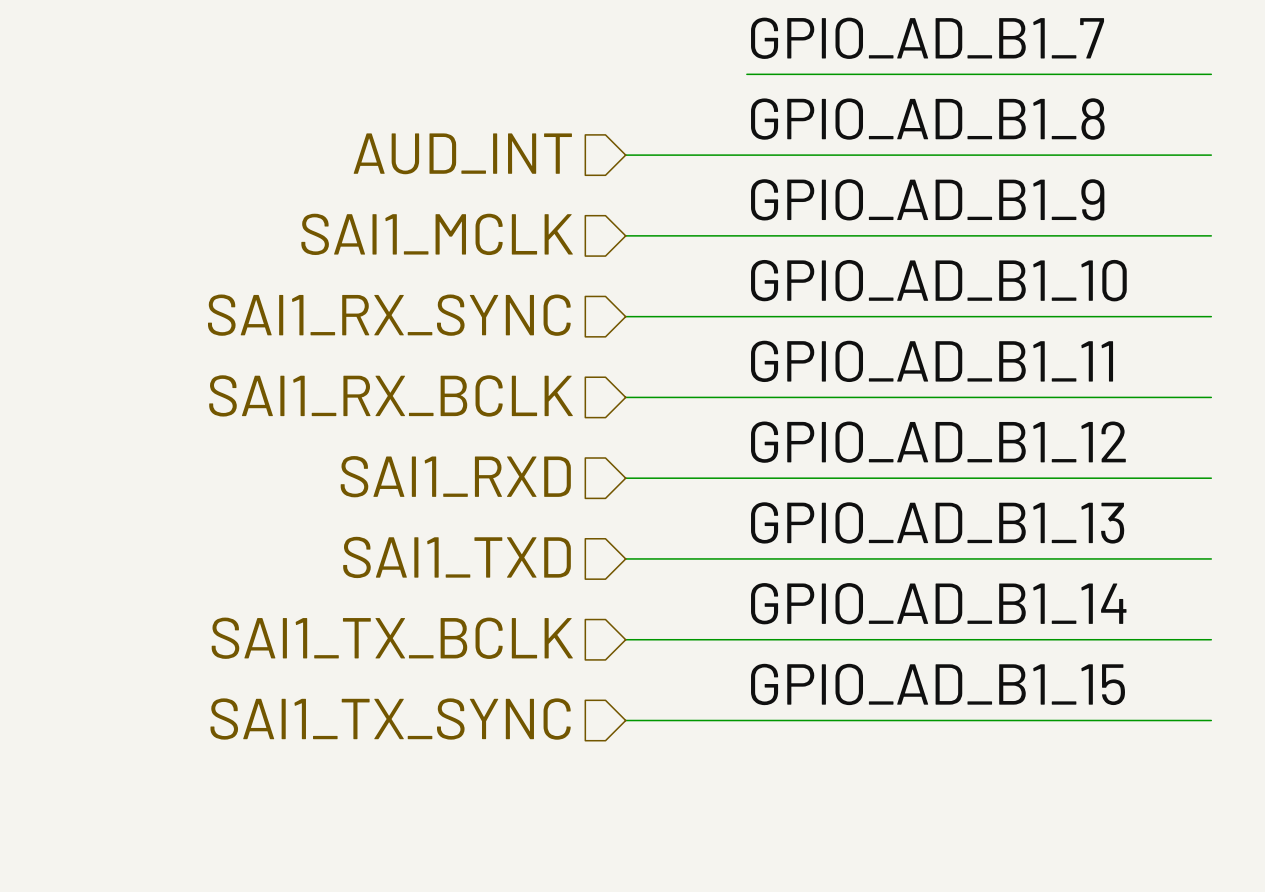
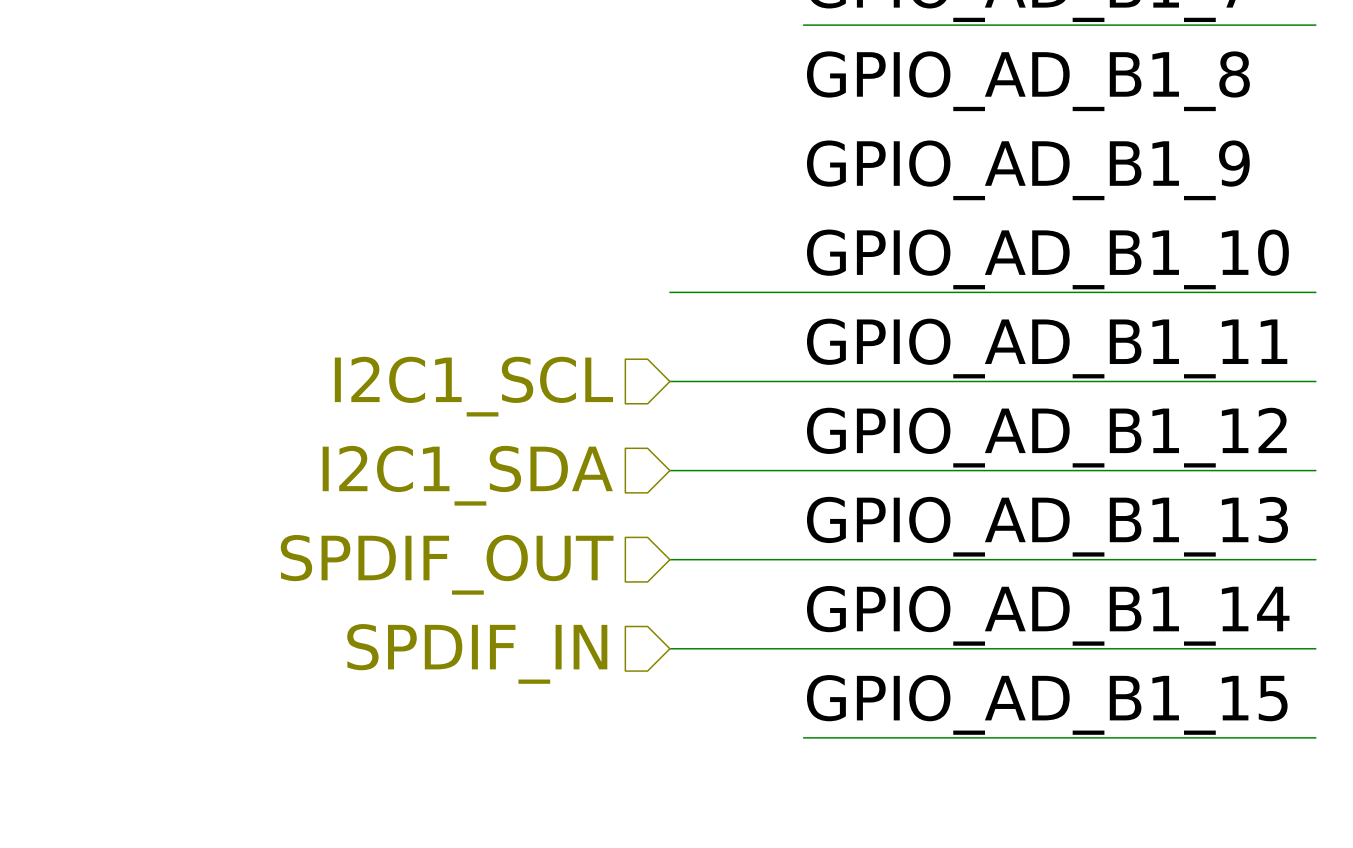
hierarchical label: AUD_INT (462, 153) -> none
wire: (625, 155) (1211, 155) -> none
hierarchical label: SAI1_MCLK (437, 234) -> none
wire: (625, 235) (1211, 235) -> none
hierarchical label: SAI1_RX_SYNC (389, 315) -> none
hierarchical label: SAI1_RX_BCLK (391, 395) -> I2C1_SCL (473, 386)
hierarchical label: SAI1_RXD (455, 476) -> I2C1_SDA (467, 475)
hierarchical label: SAI1_TXD (457, 557) -> SPDIF_OUT (447, 564)
hierarchical label: SAI1_TX_BCLK (392, 638) -> SPDIF_IN (477, 653)
hierarchical label: SAI1_TX_SYNC (390, 719) -> none
wire: (625, 720) (746, 720) -> none

